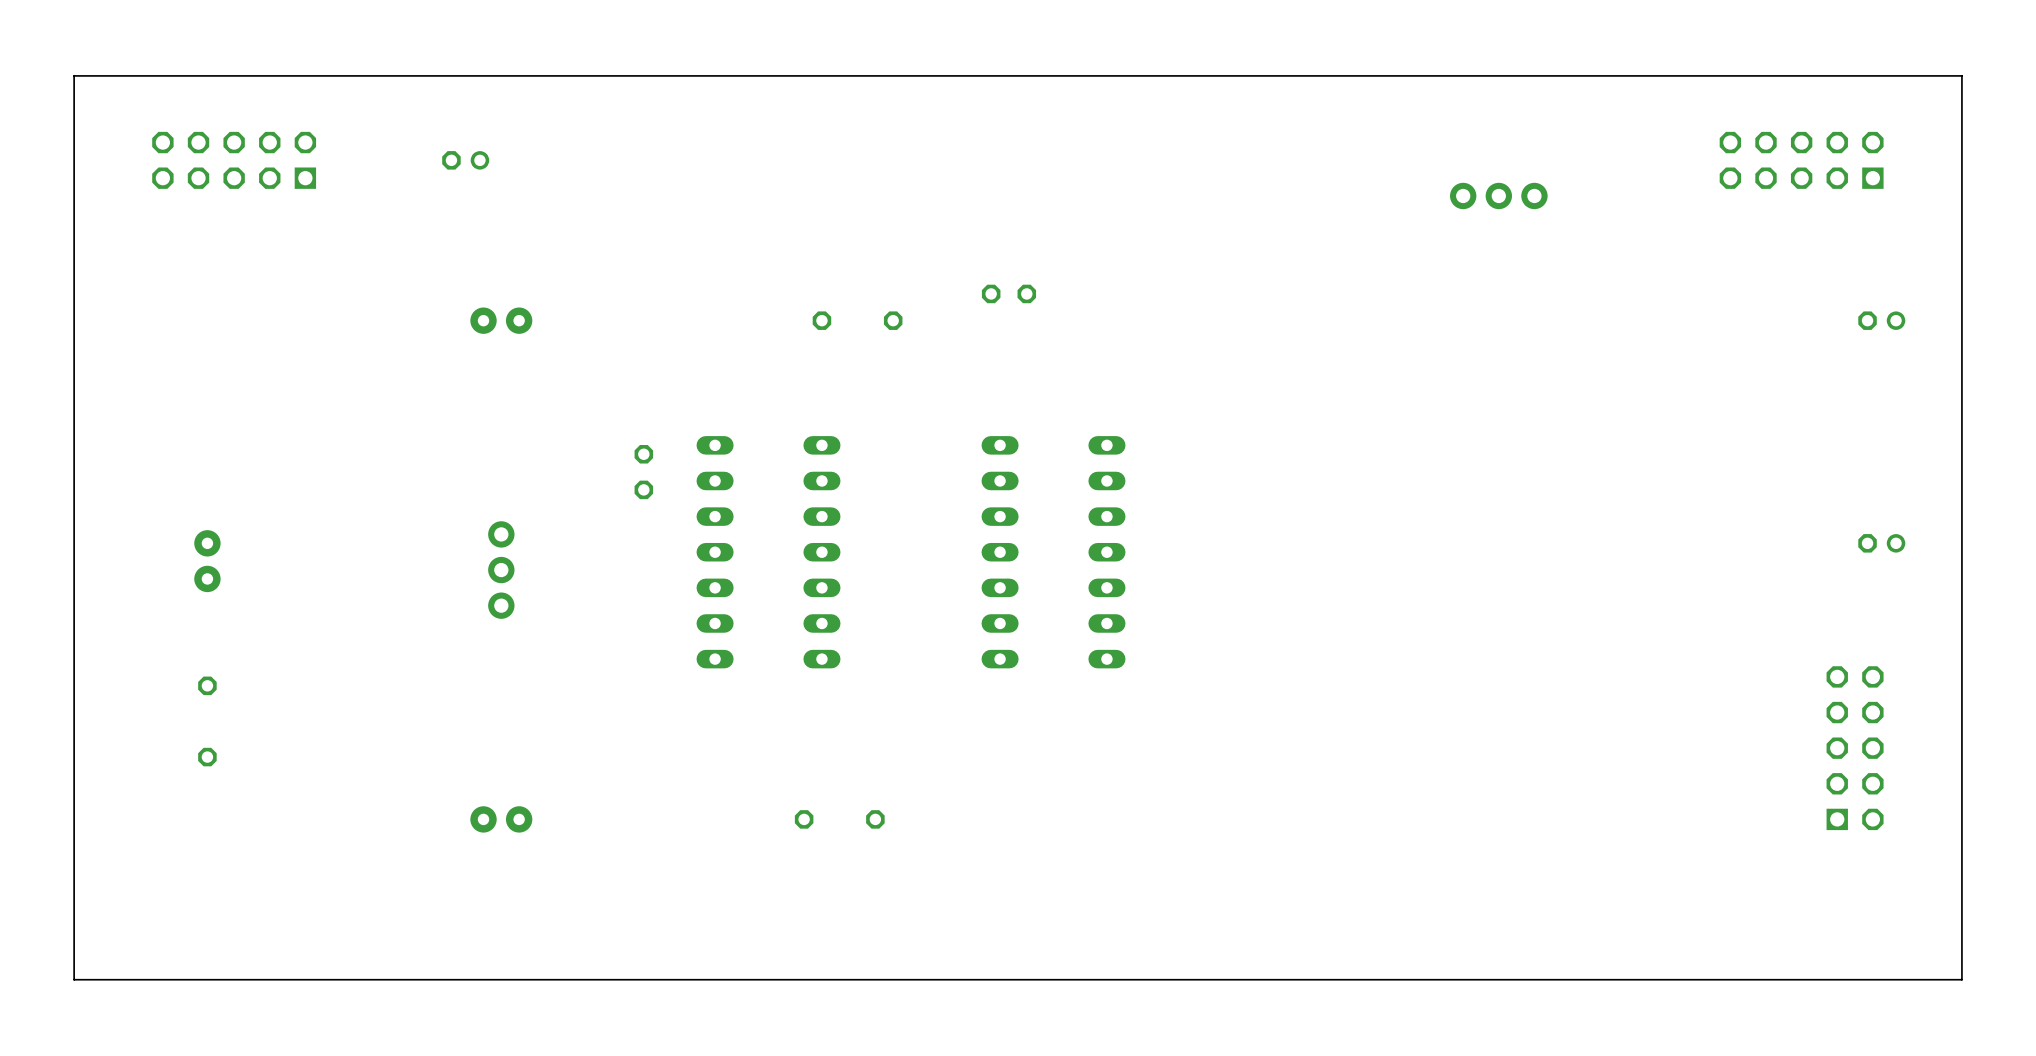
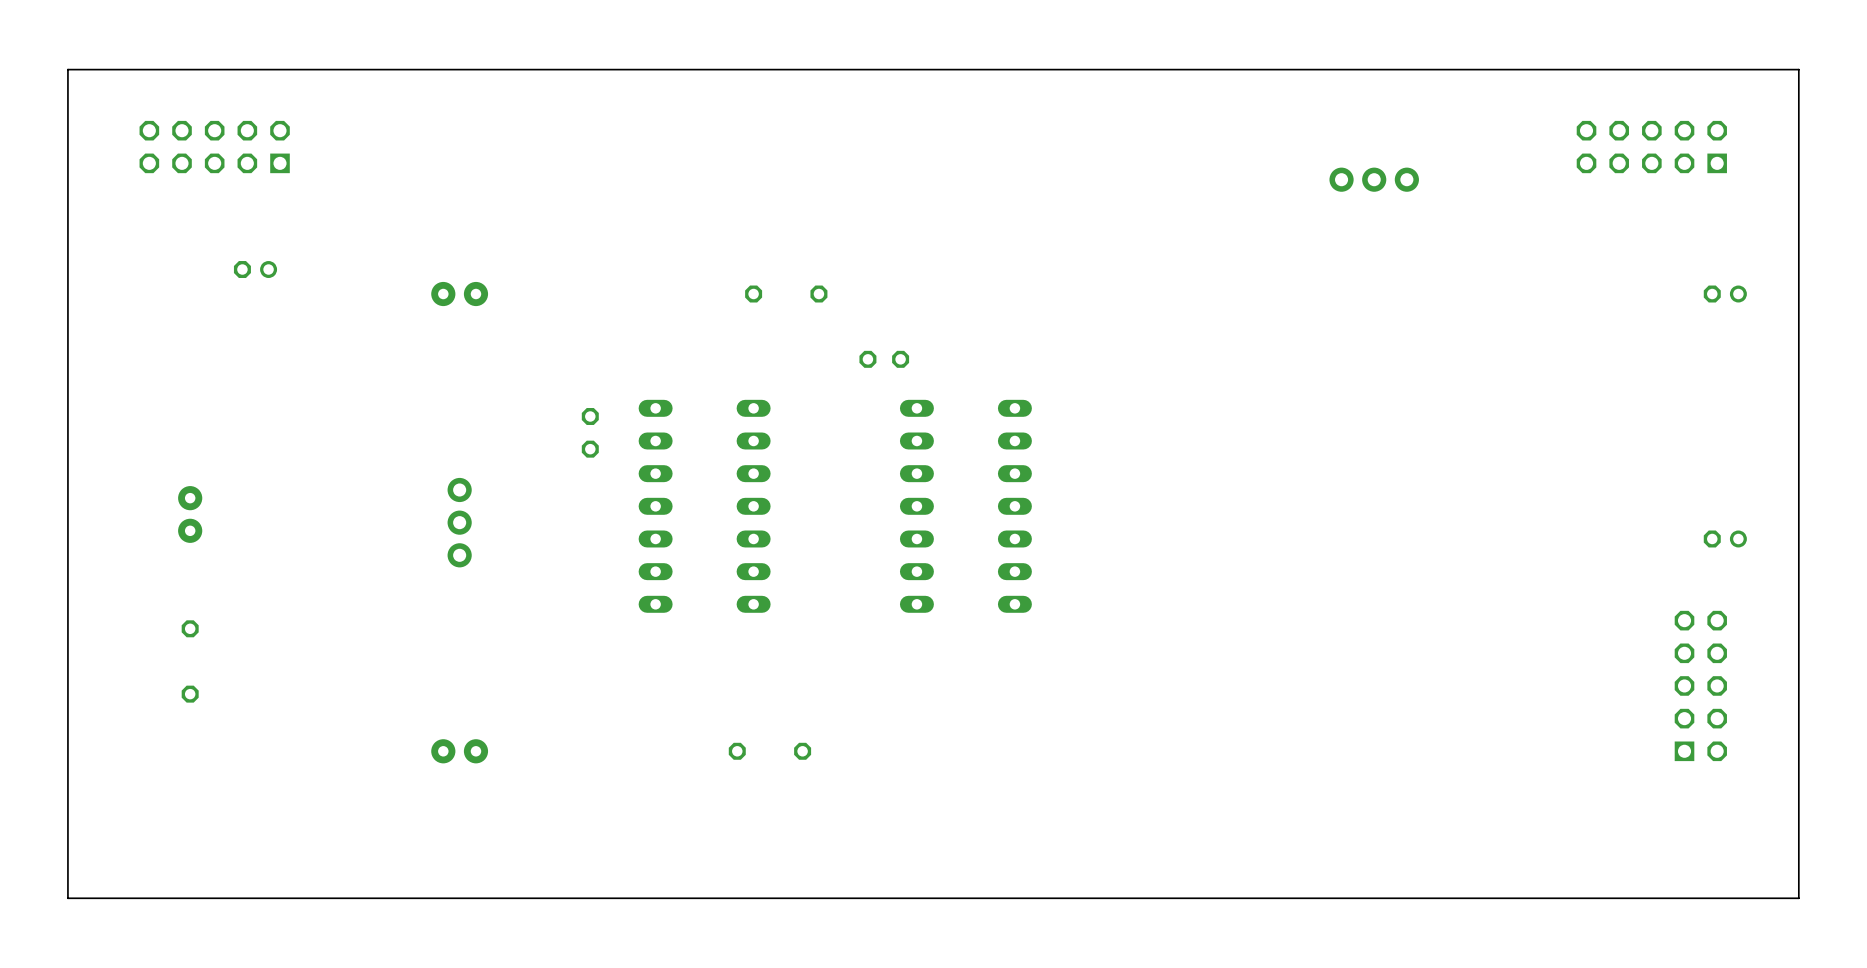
part position: (465, 160) -> (255, 269)
part position: (1008, 293) -> (884, 359)
part position: (1881, 543) -> (1725, 538)

